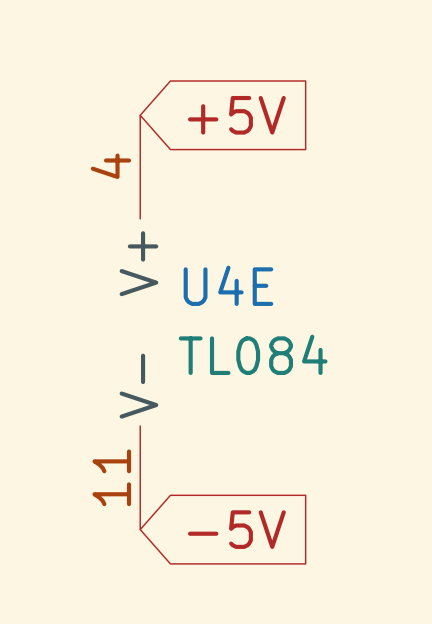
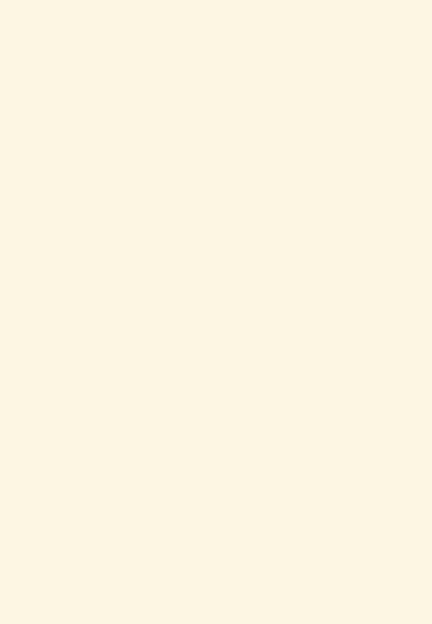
global label: +5V (236, 115) -> none
U4E: TL084 (140, 322) -> none
global label: -5V (236, 529) -> none

